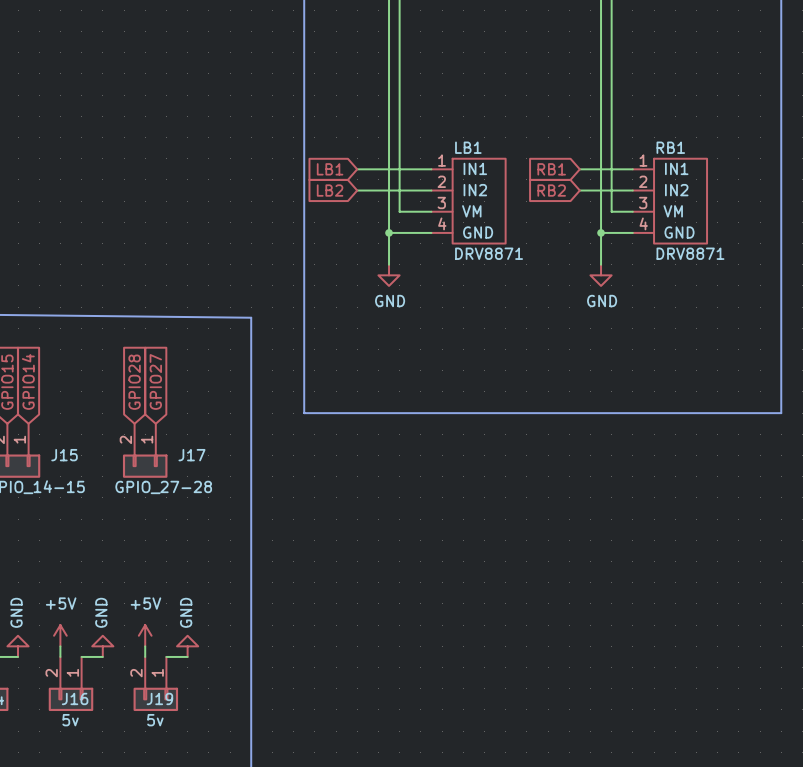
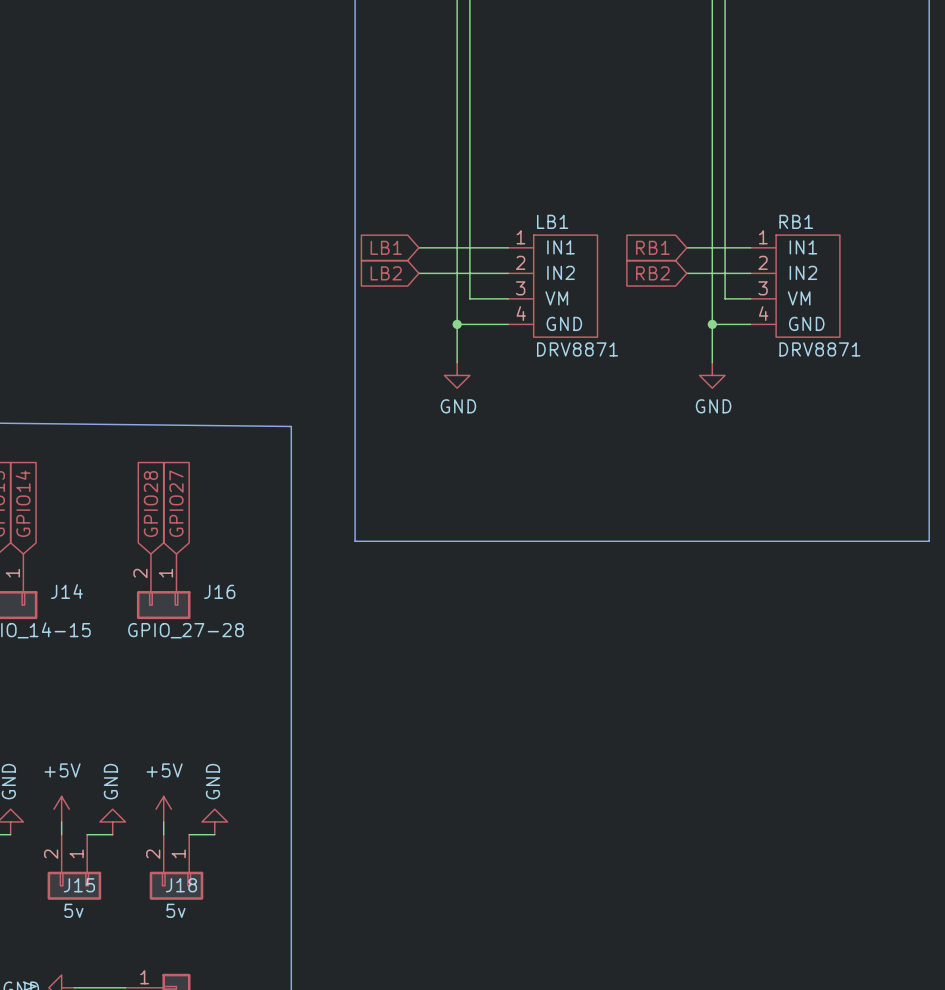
J15 name: J15 (64, 455) -> J14 (66, 591)
J17 name: J17 (191, 455) -> J16 (219, 591)
J16 name: J16 (75, 698) -> J15 (79, 885)
J19 name: J19 (159, 698) -> J18 (181, 885)

